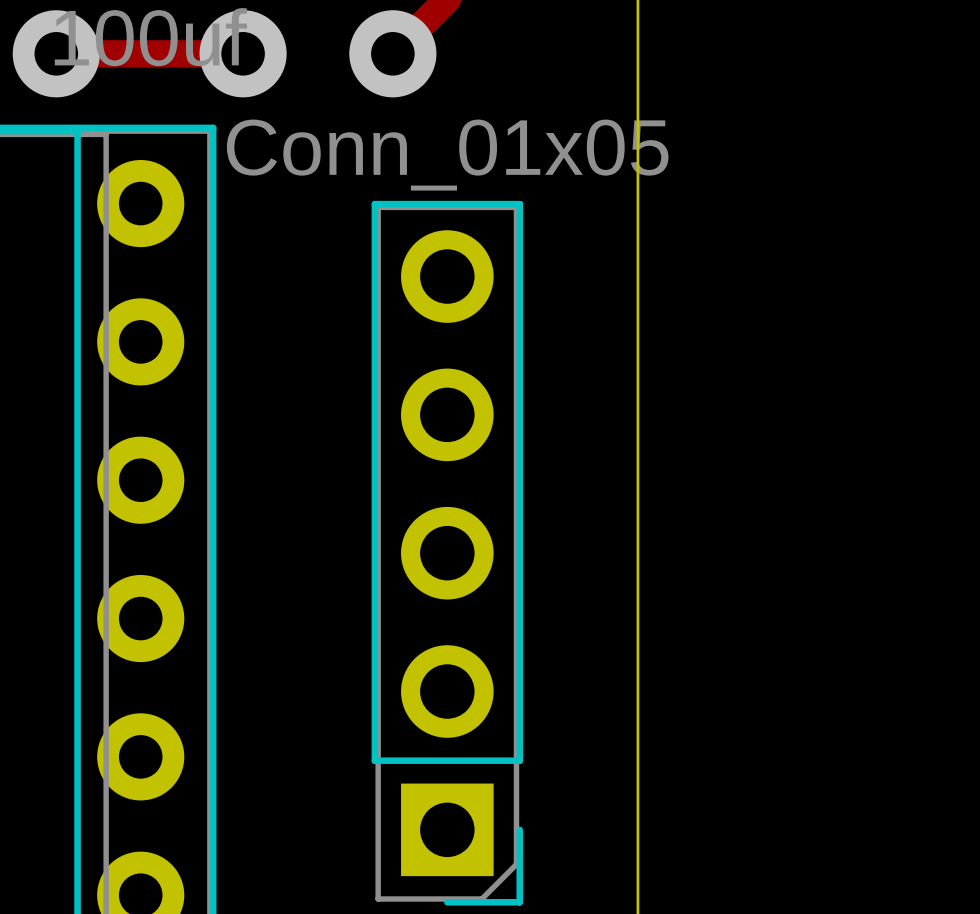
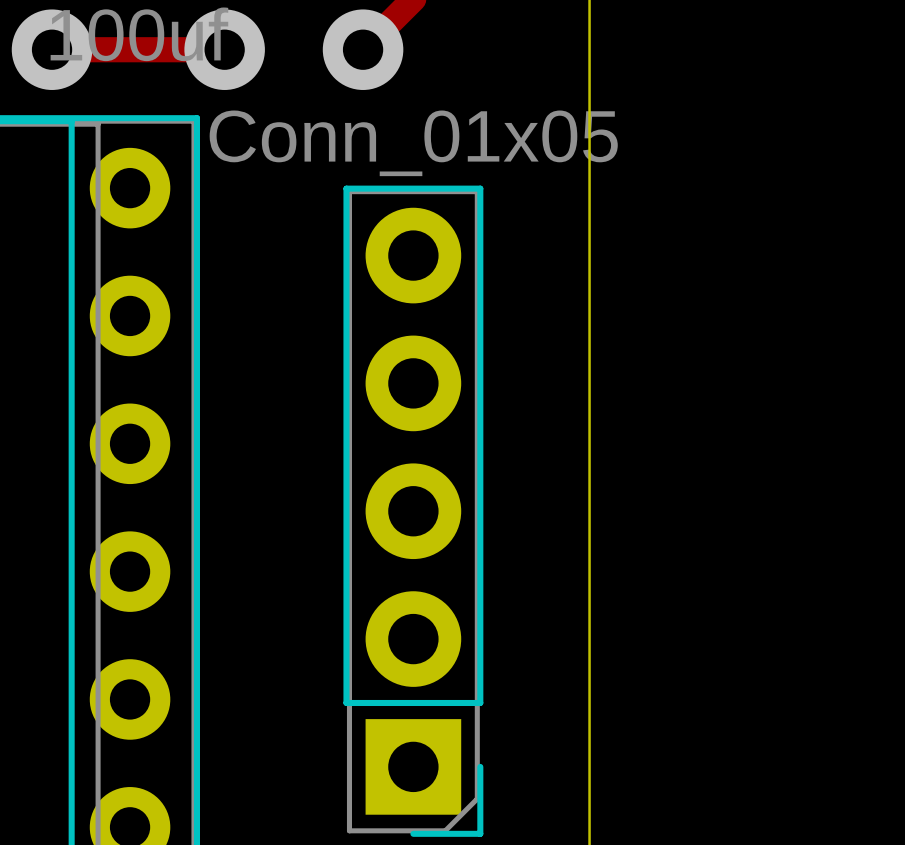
part footprint: [371, 200, 524, 906] -> [343, 185, 484, 837]

